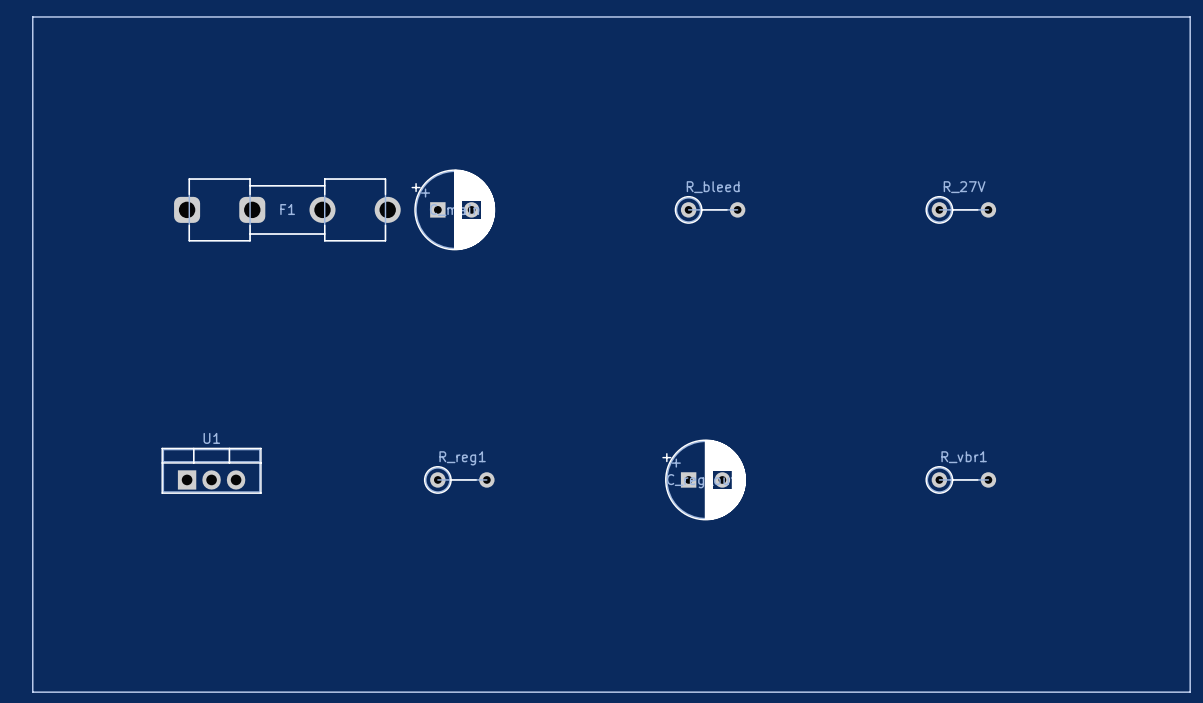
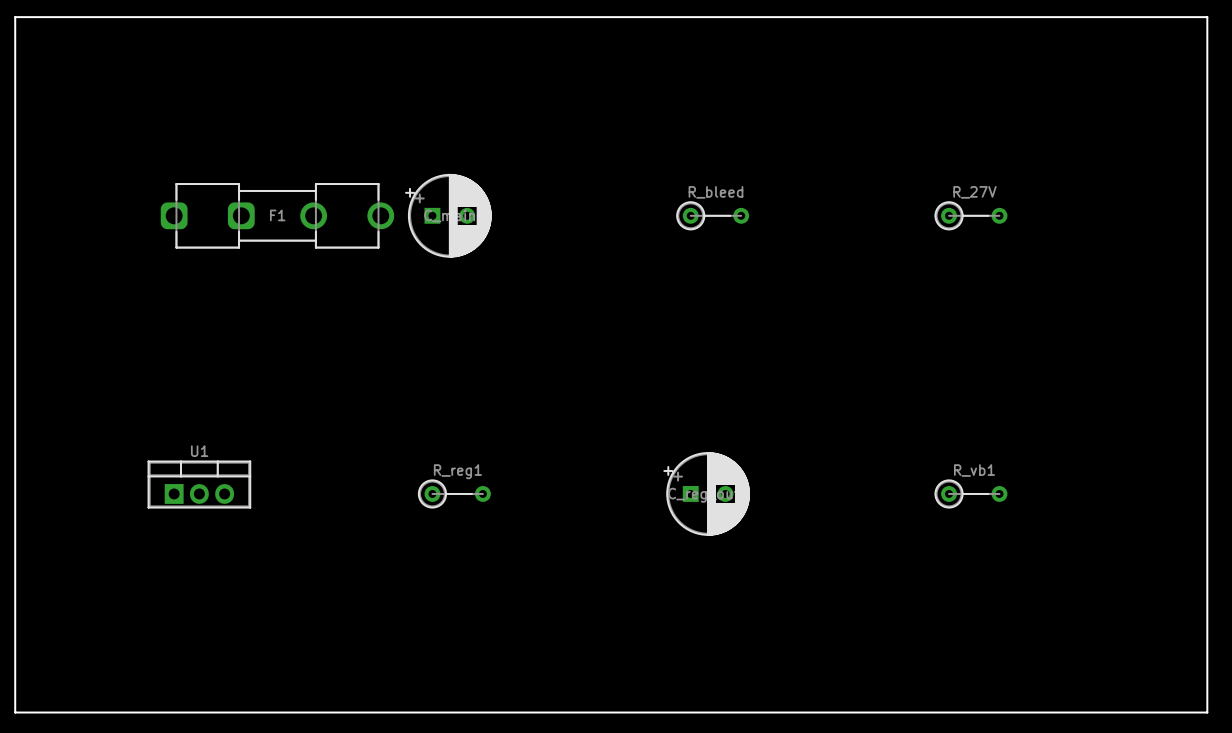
R_vbr1 name: R_vbr1 (964, 457) -> R_vb1 (974, 470)

